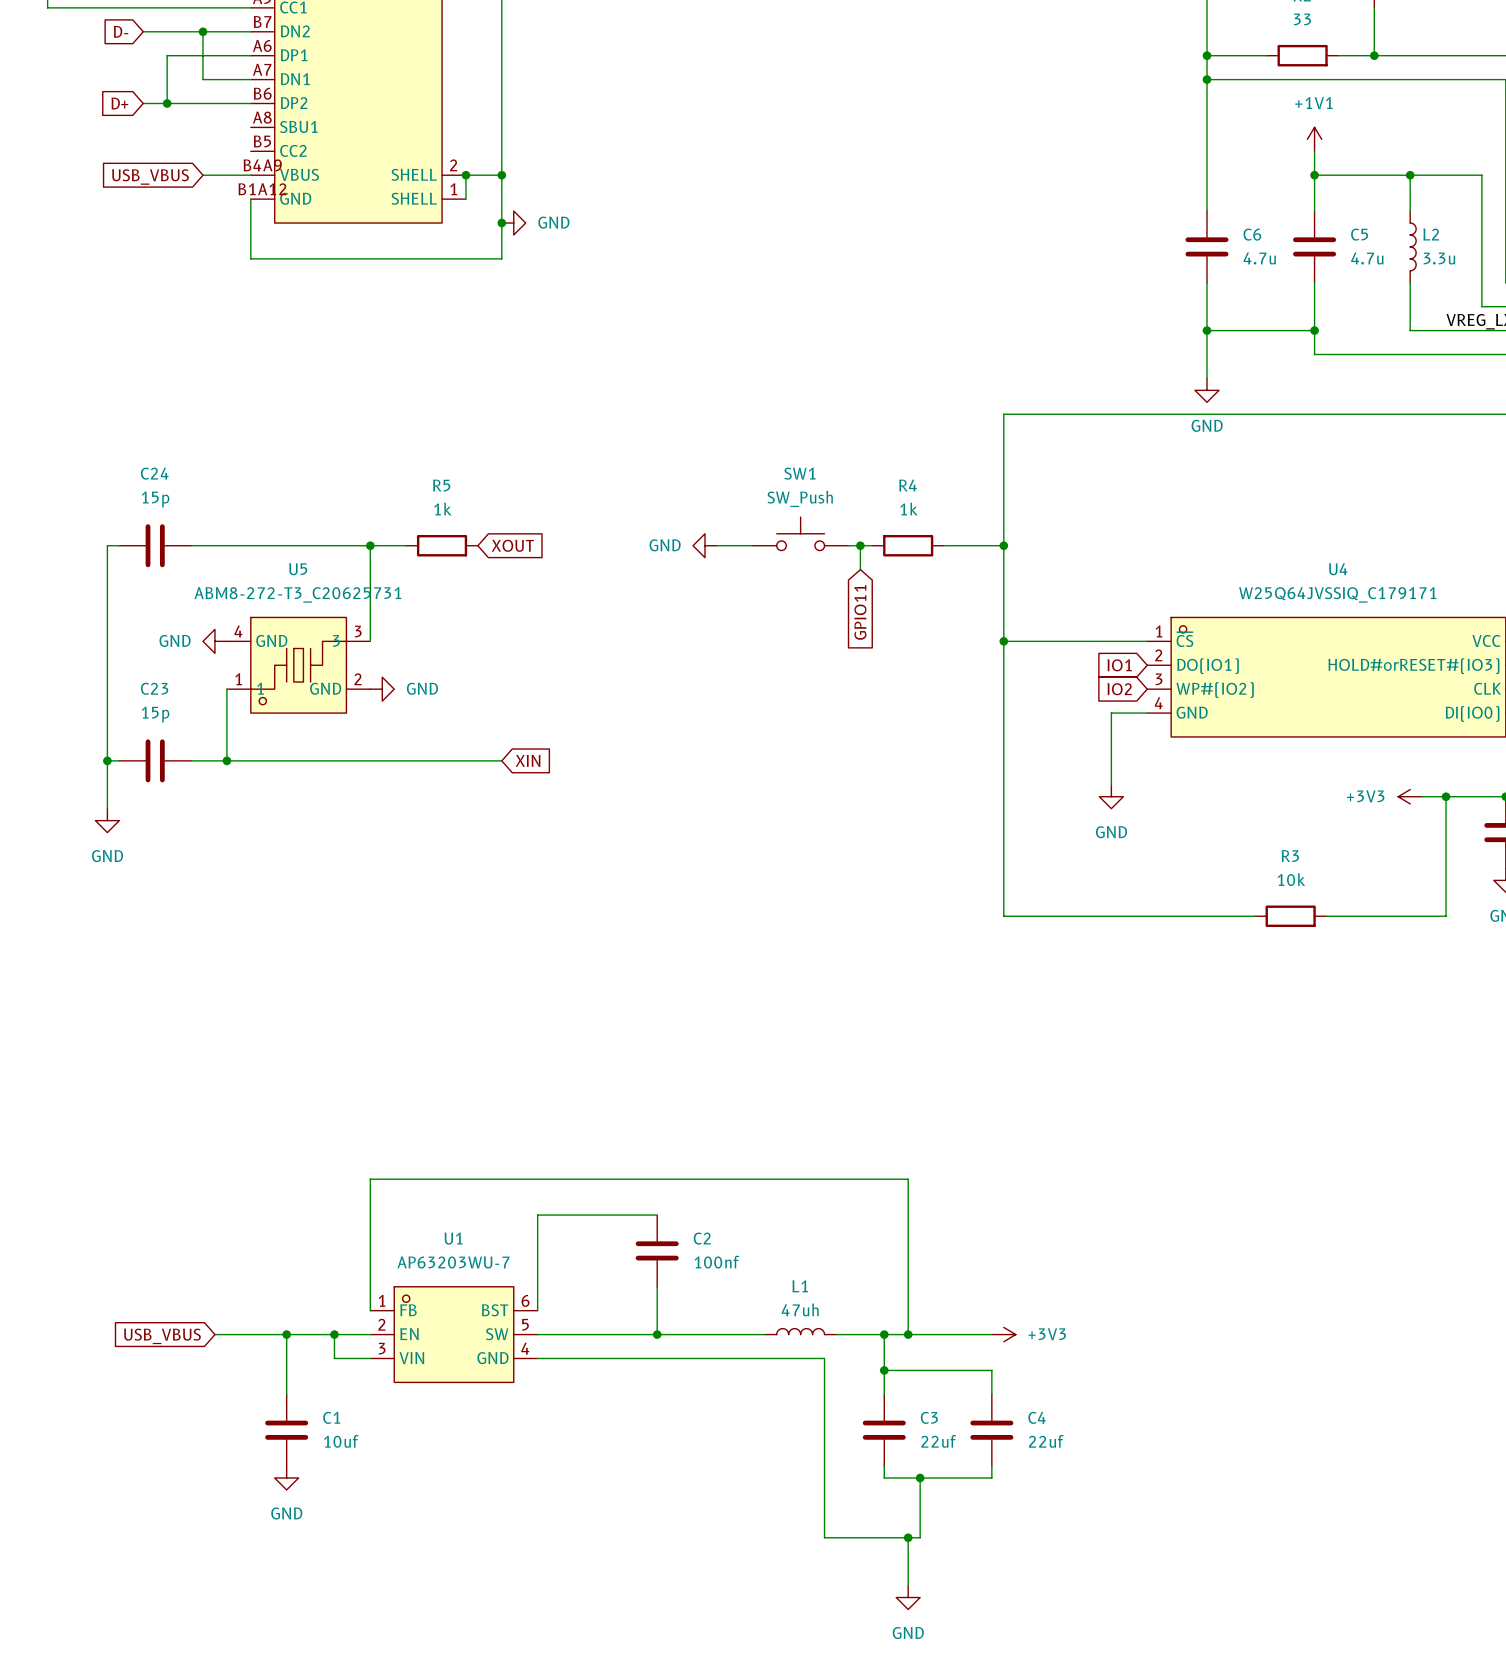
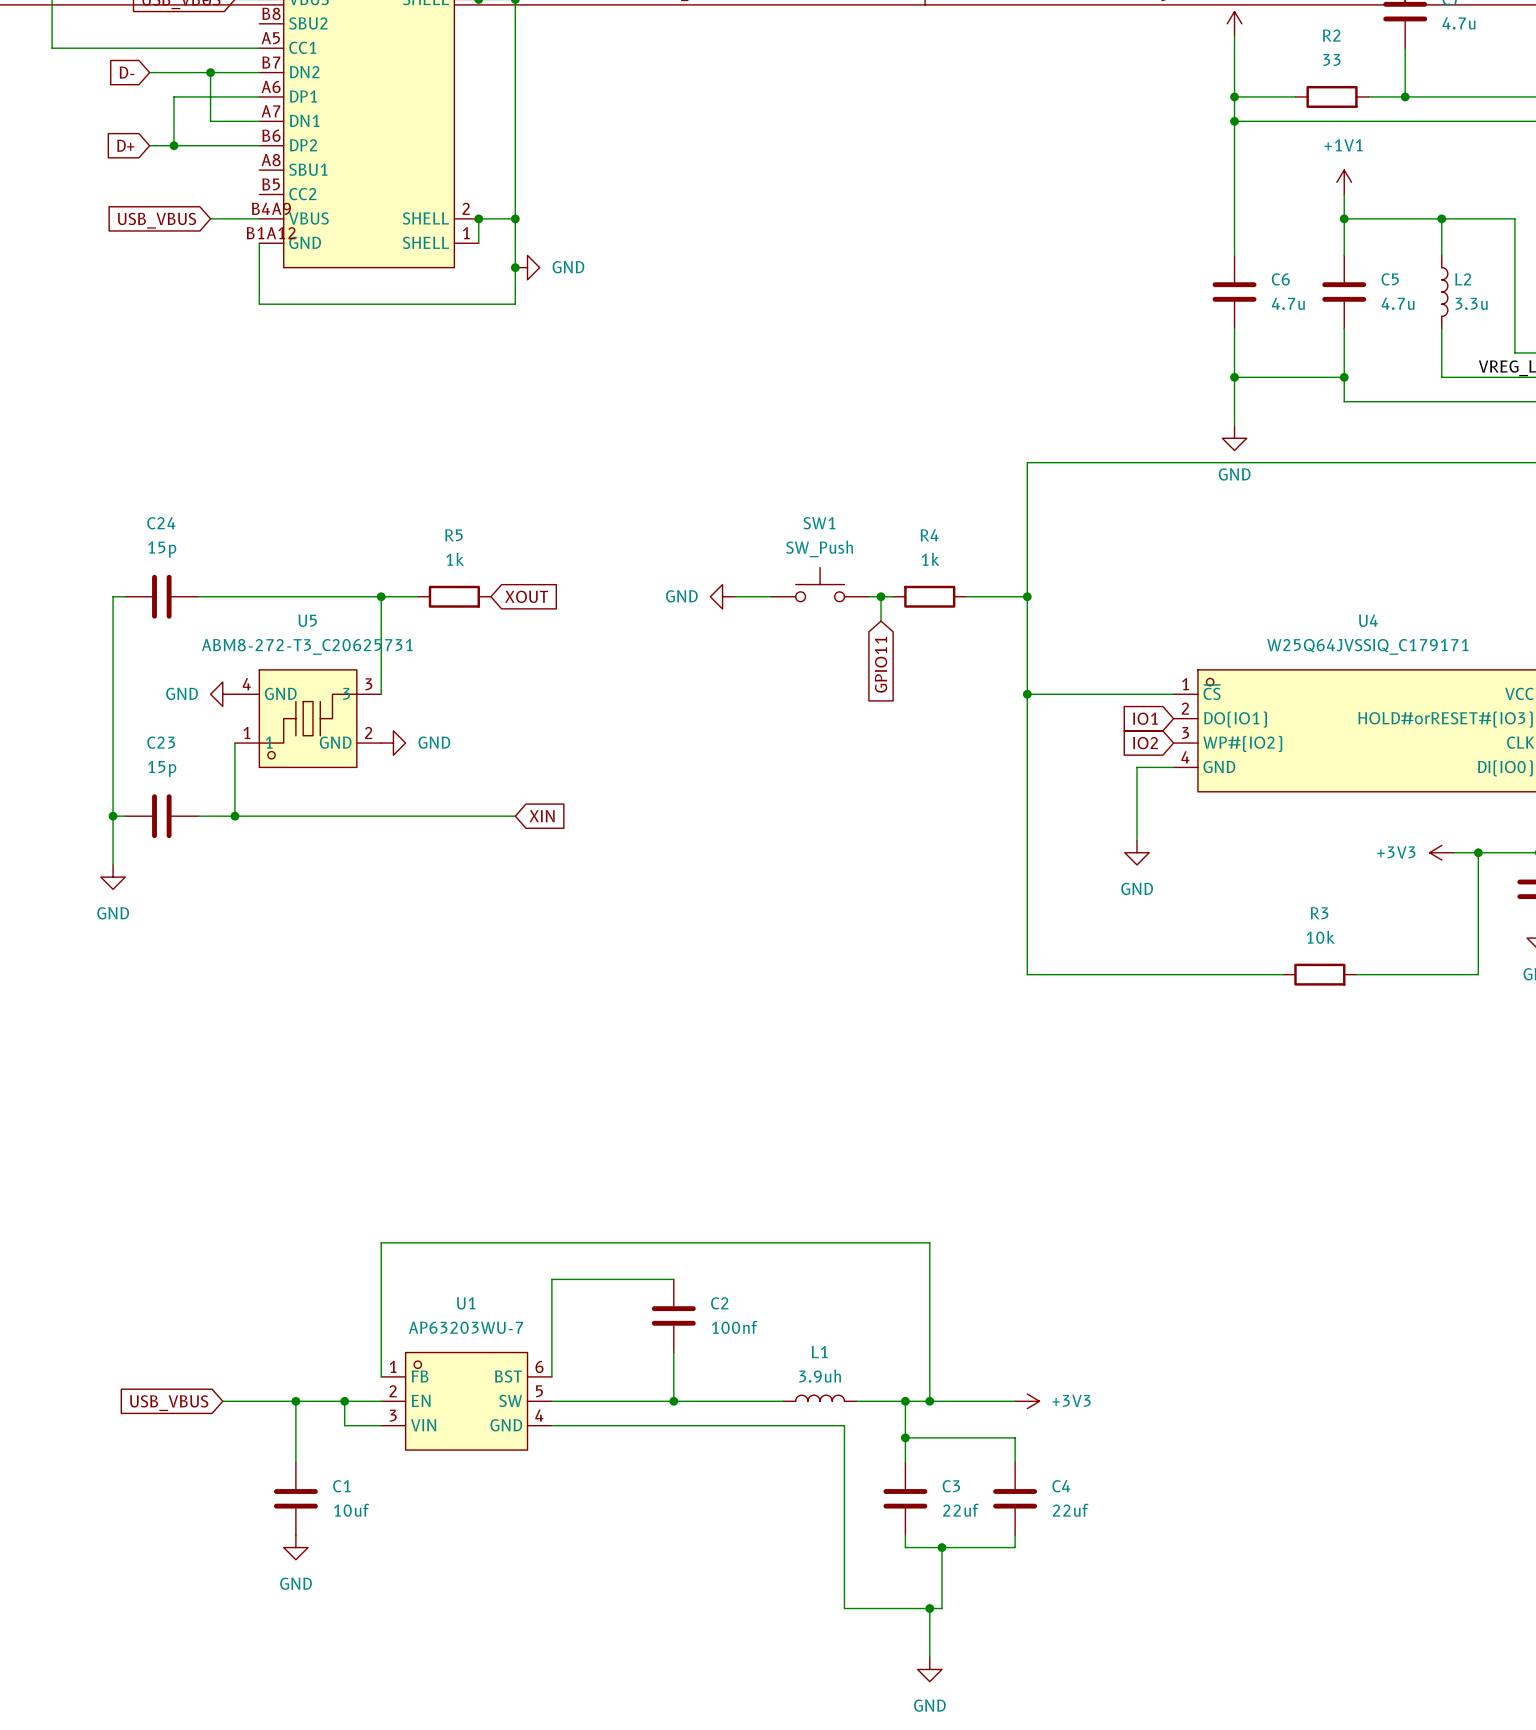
L1 value: 47uh (800, 1309) -> 3.9uh (820, 1376)

